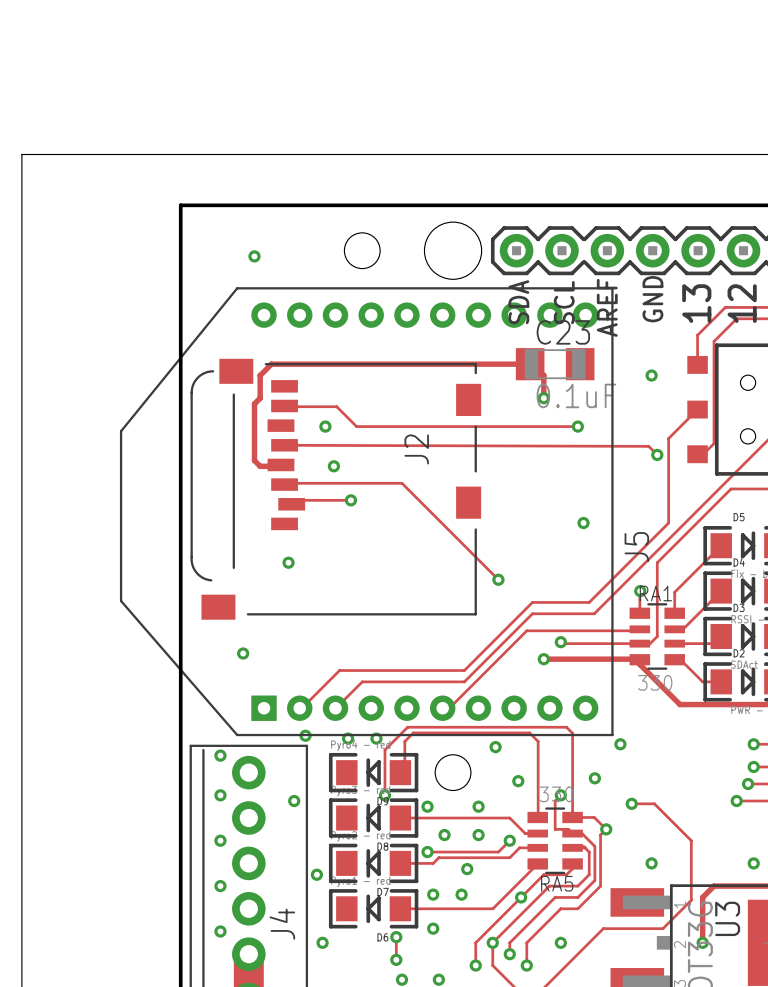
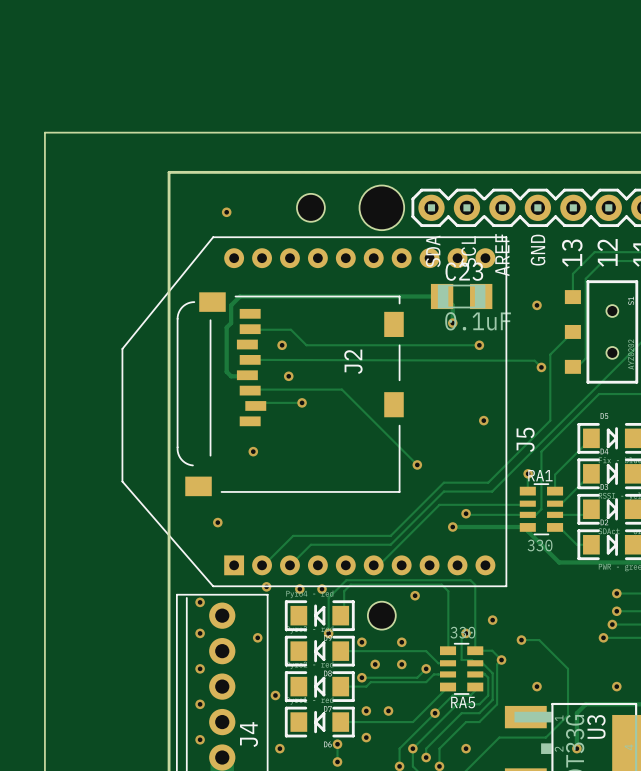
via: (620, 744) -> none
via: (518, 781) -> none
via: (467, 869) -> none

